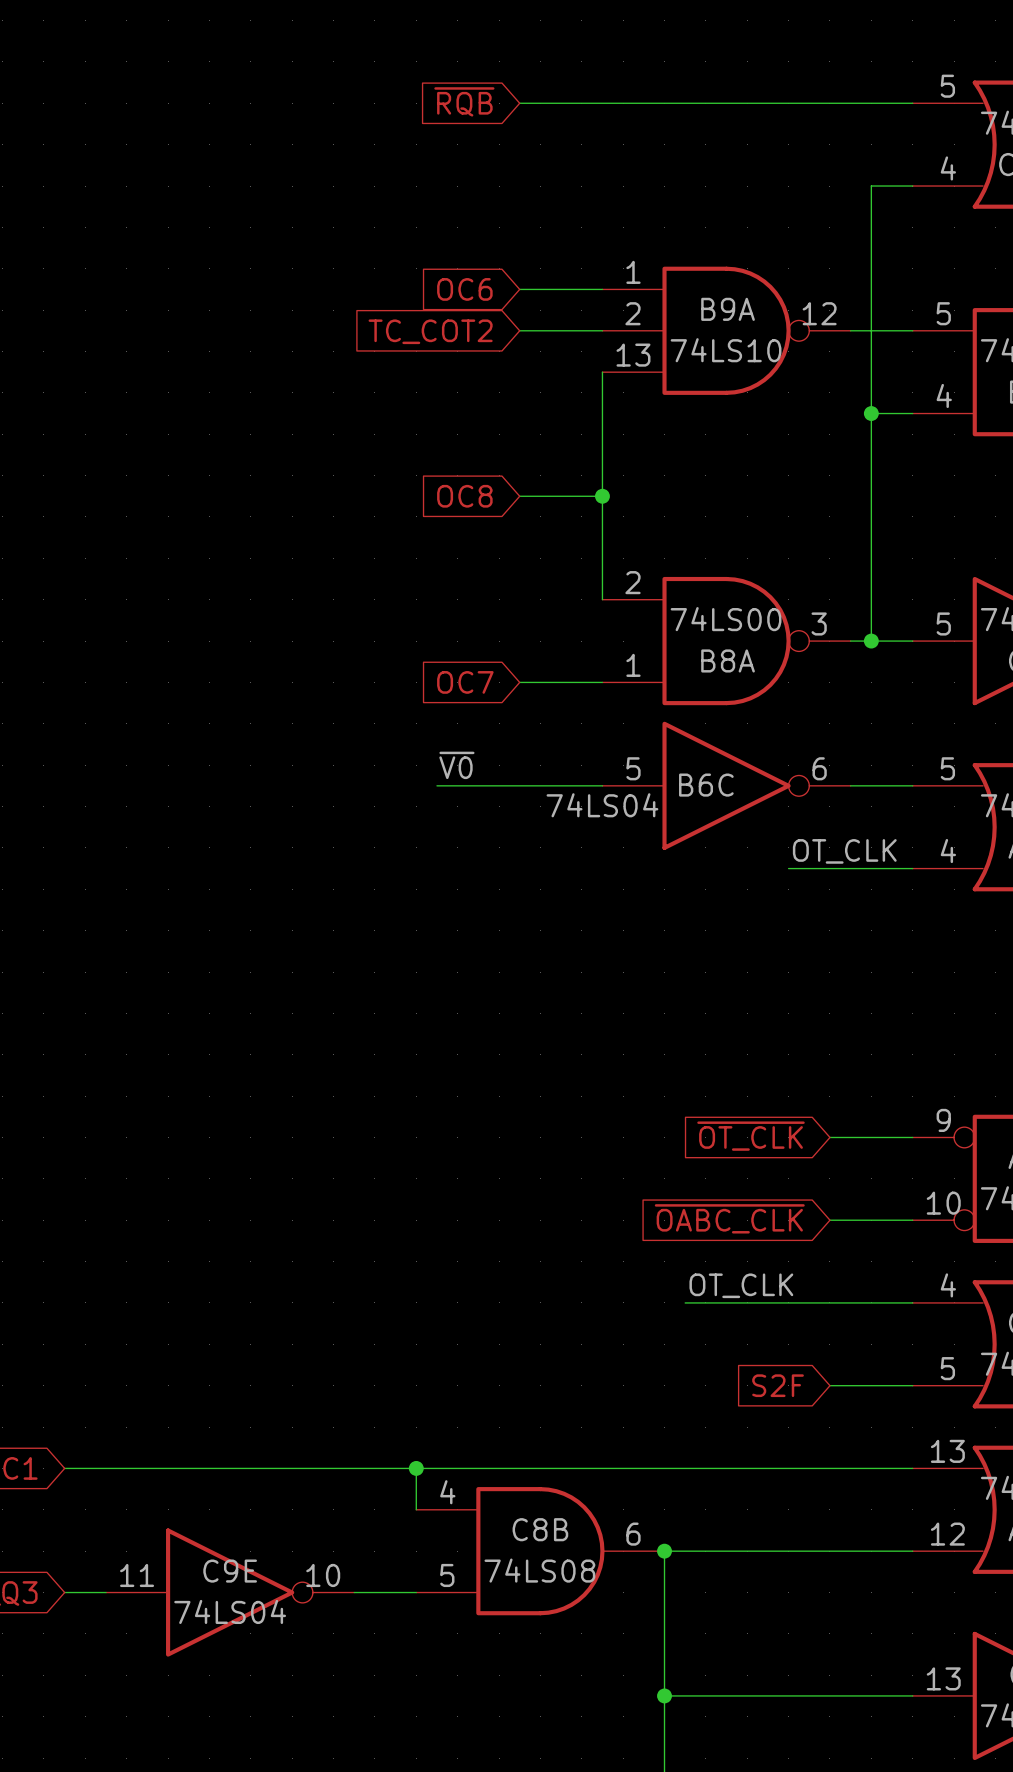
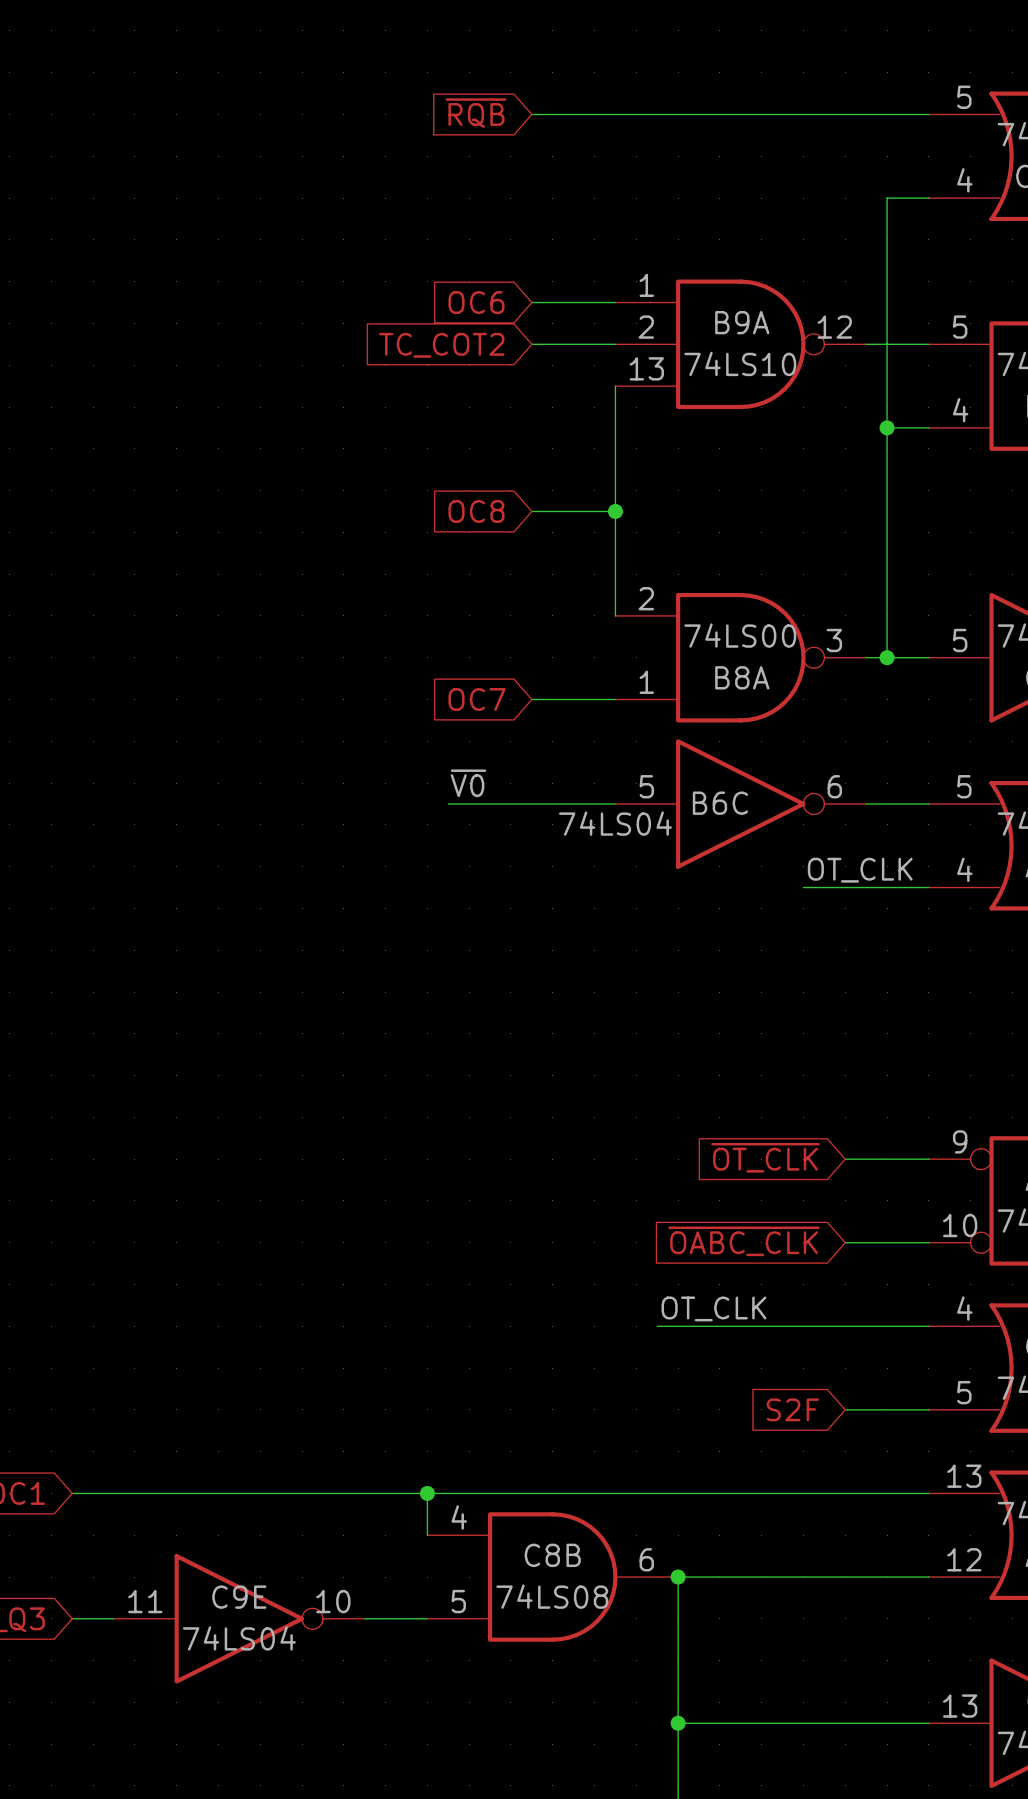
label position: OT_CLK (741, 1285) -> OT_CLK (713, 1308)
wire: none -> (657, 1326) (699, 1326)

